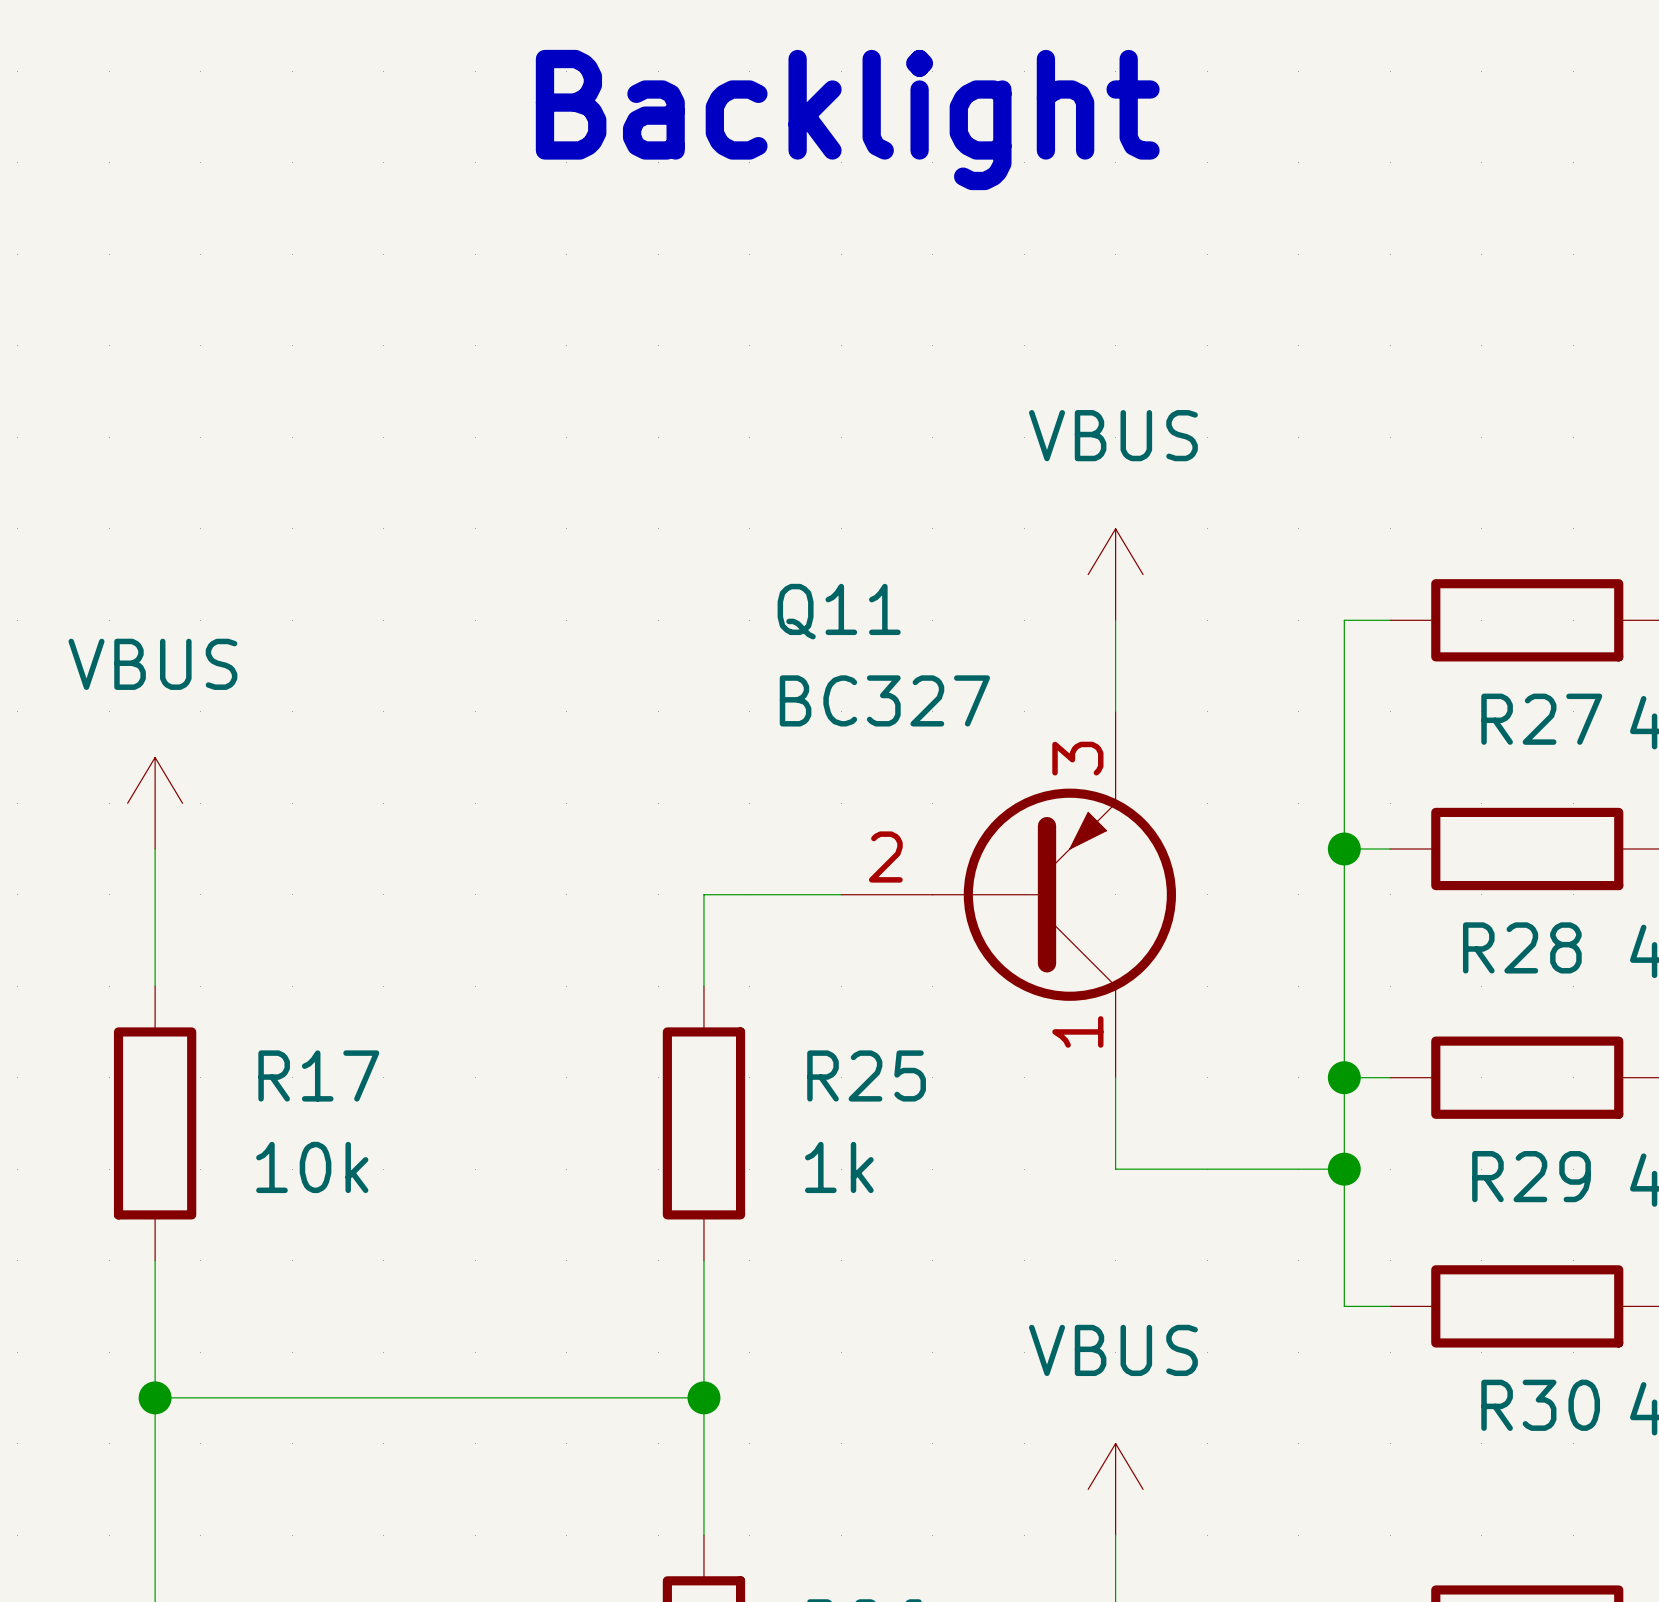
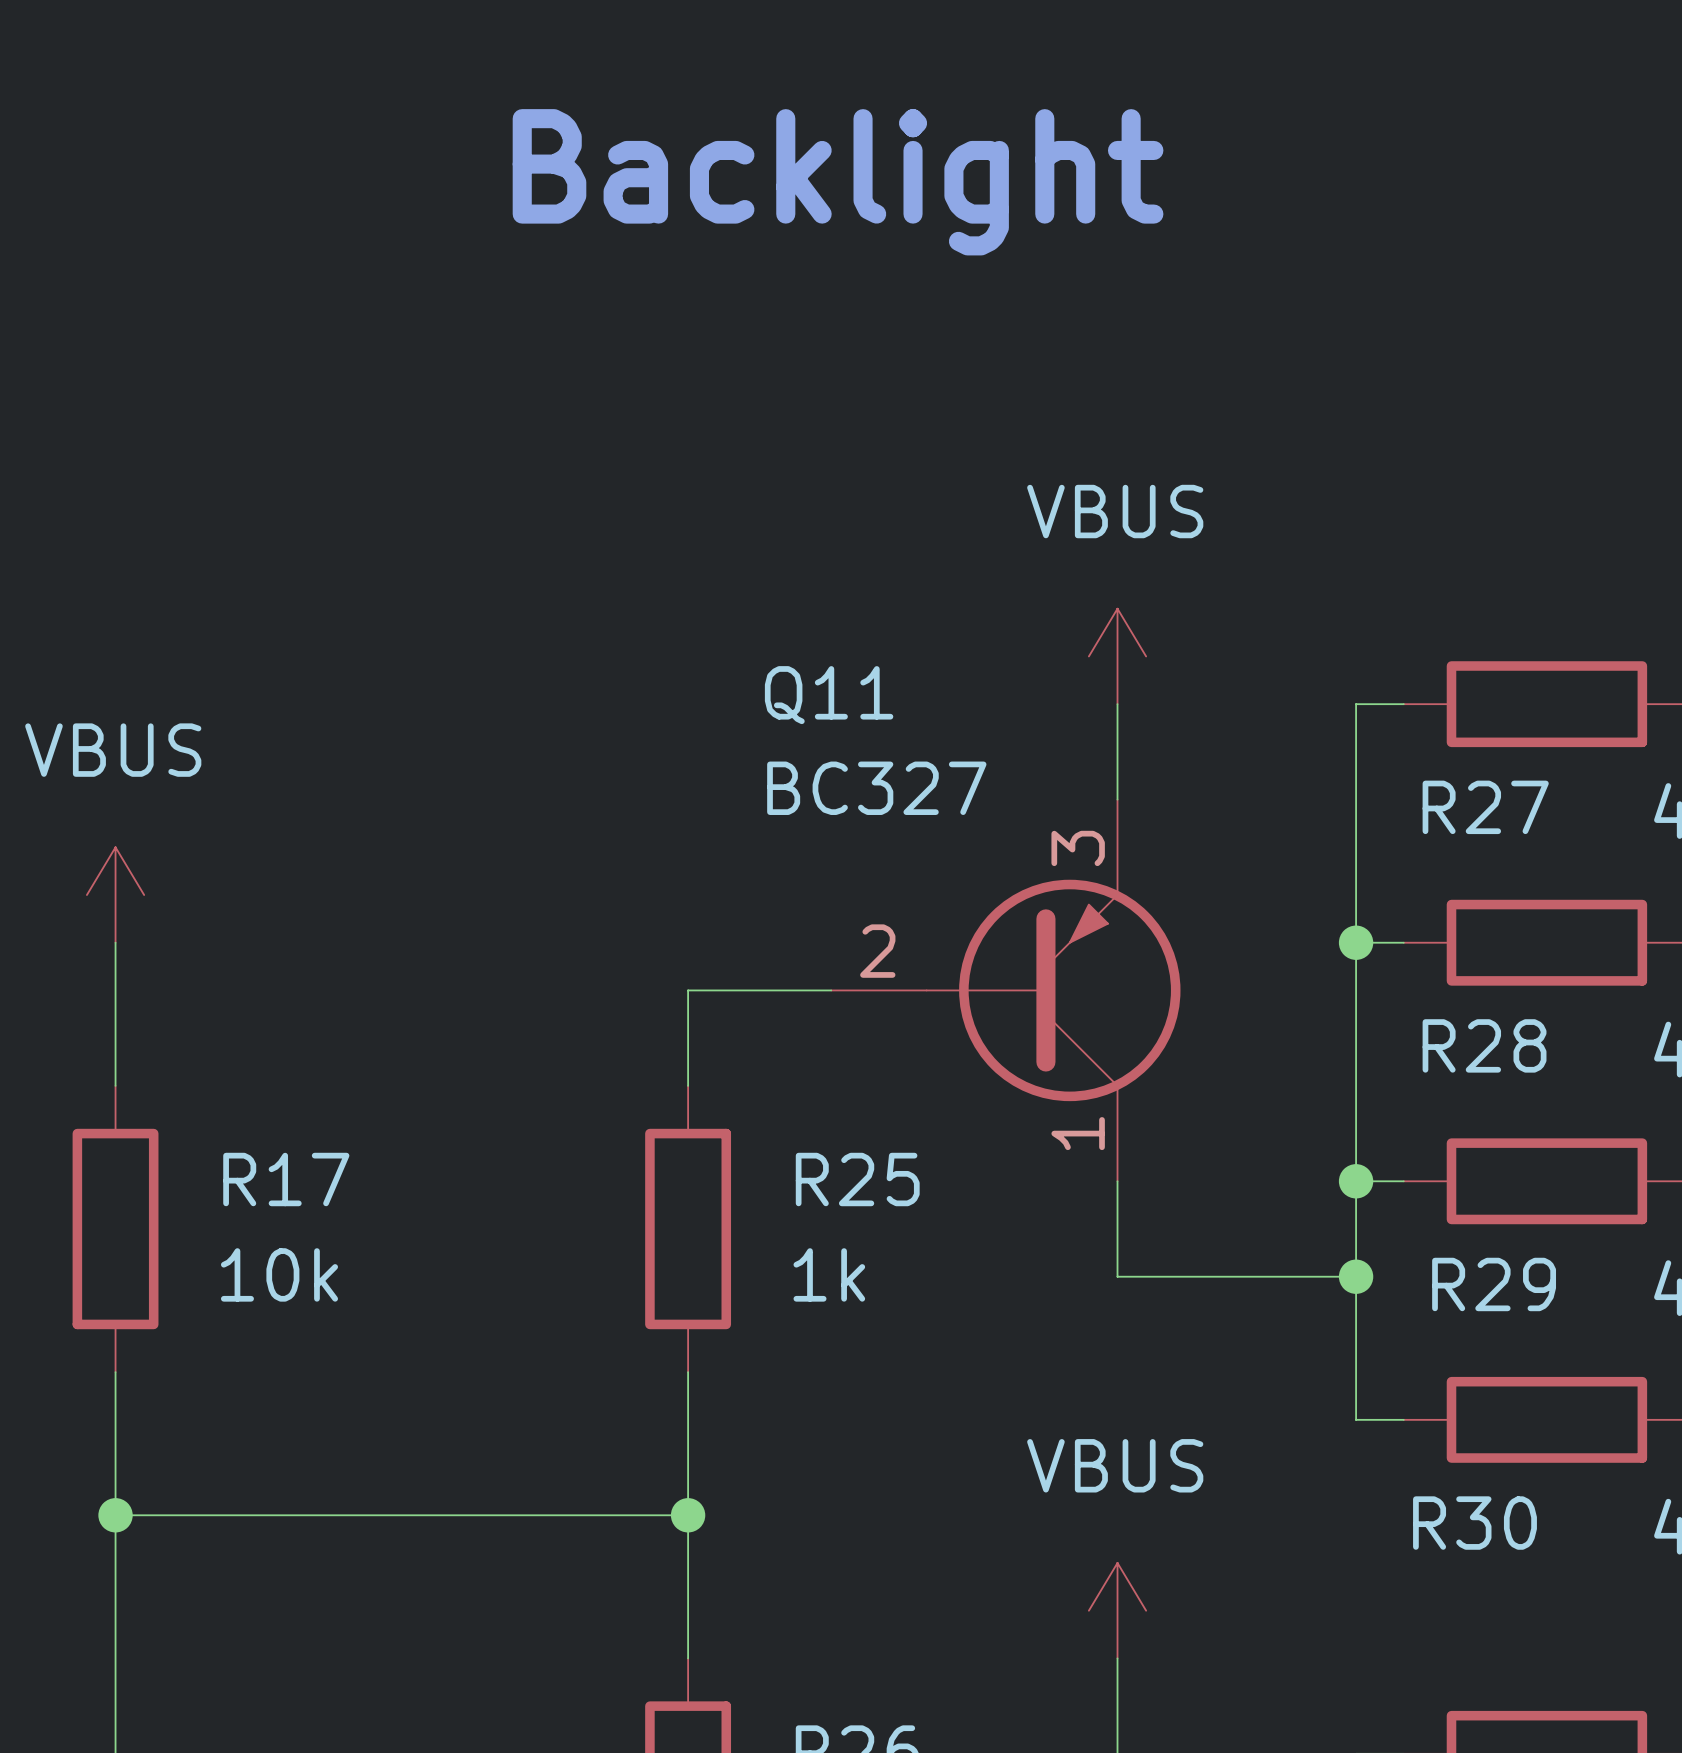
R27 name position: R27 (1541, 719) -> R27 (1485, 807)
R28 name position: R28 (1522, 947) -> R28 (1484, 1045)
R29 name position: R29 (1531, 1176) -> R29 (1494, 1284)
R30 name position: R30 (1540, 1405) -> R30 (1474, 1523)

